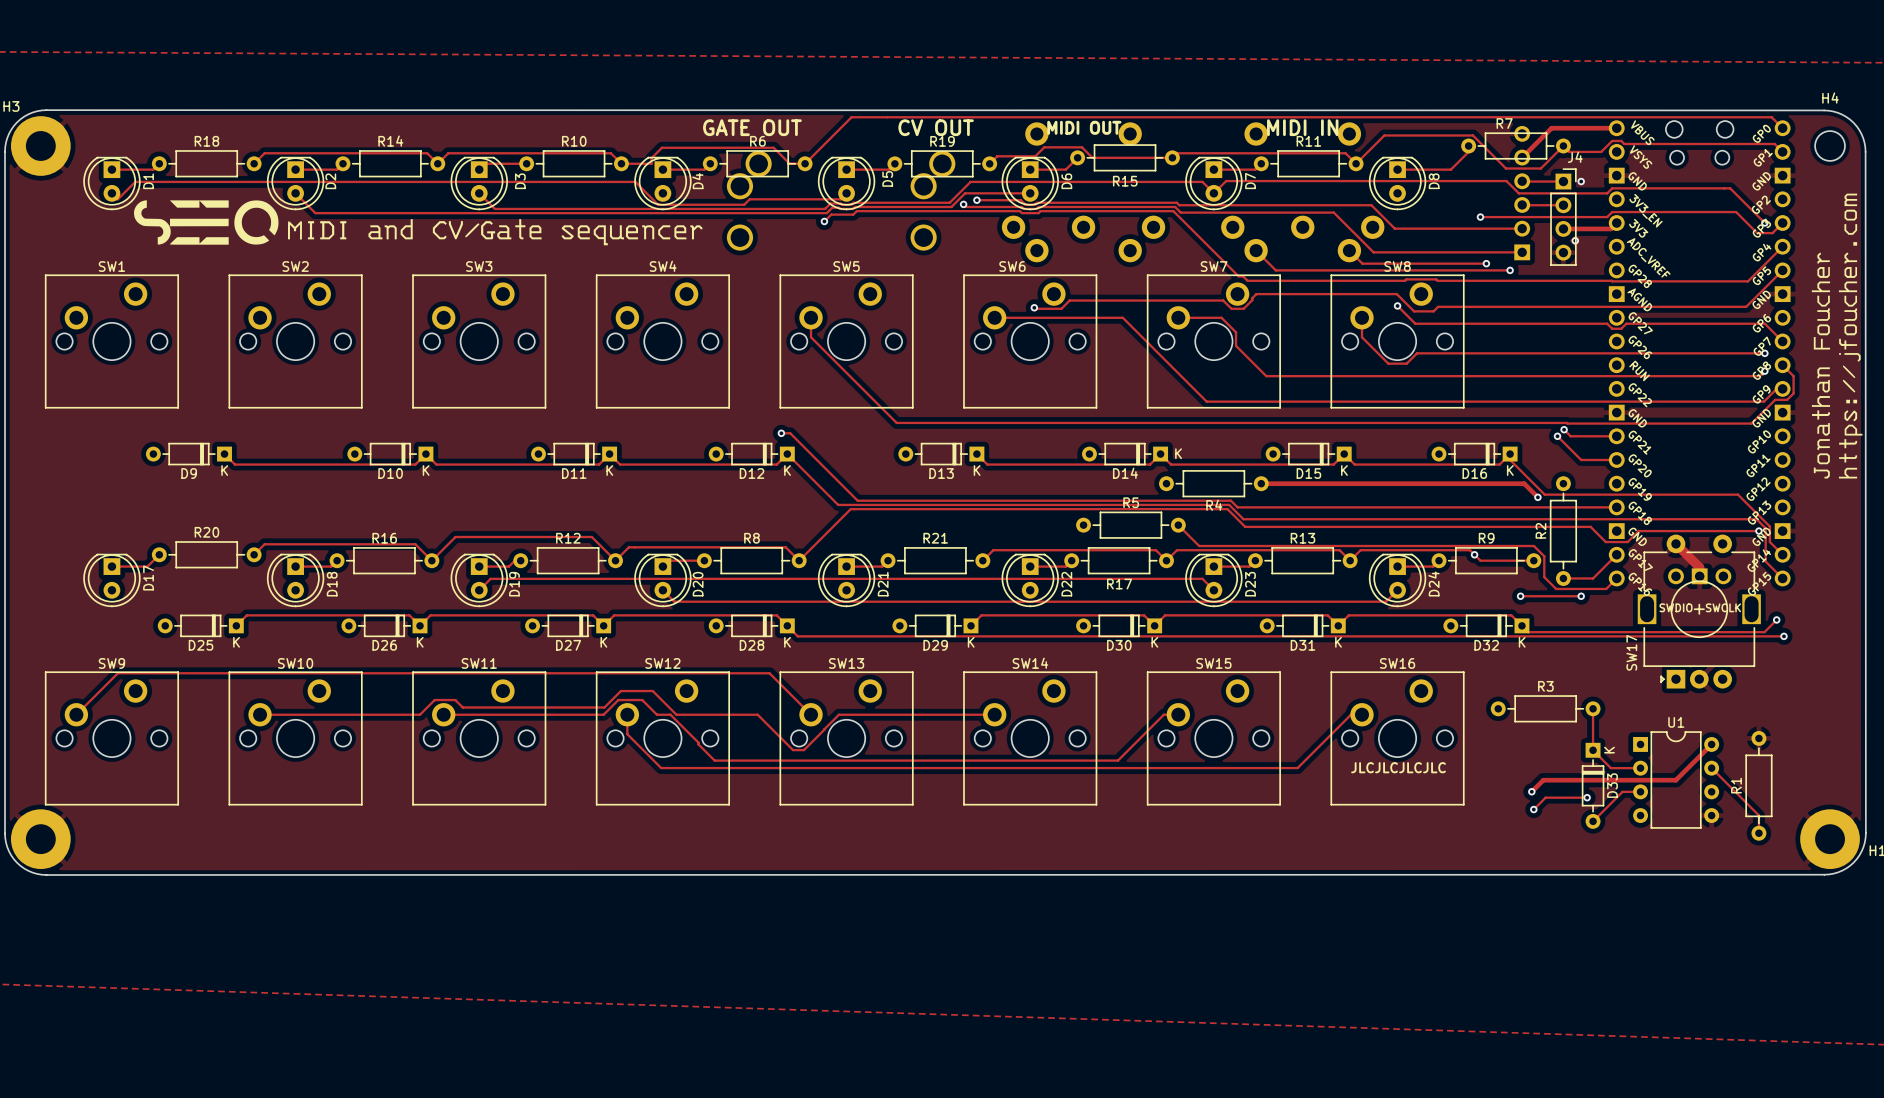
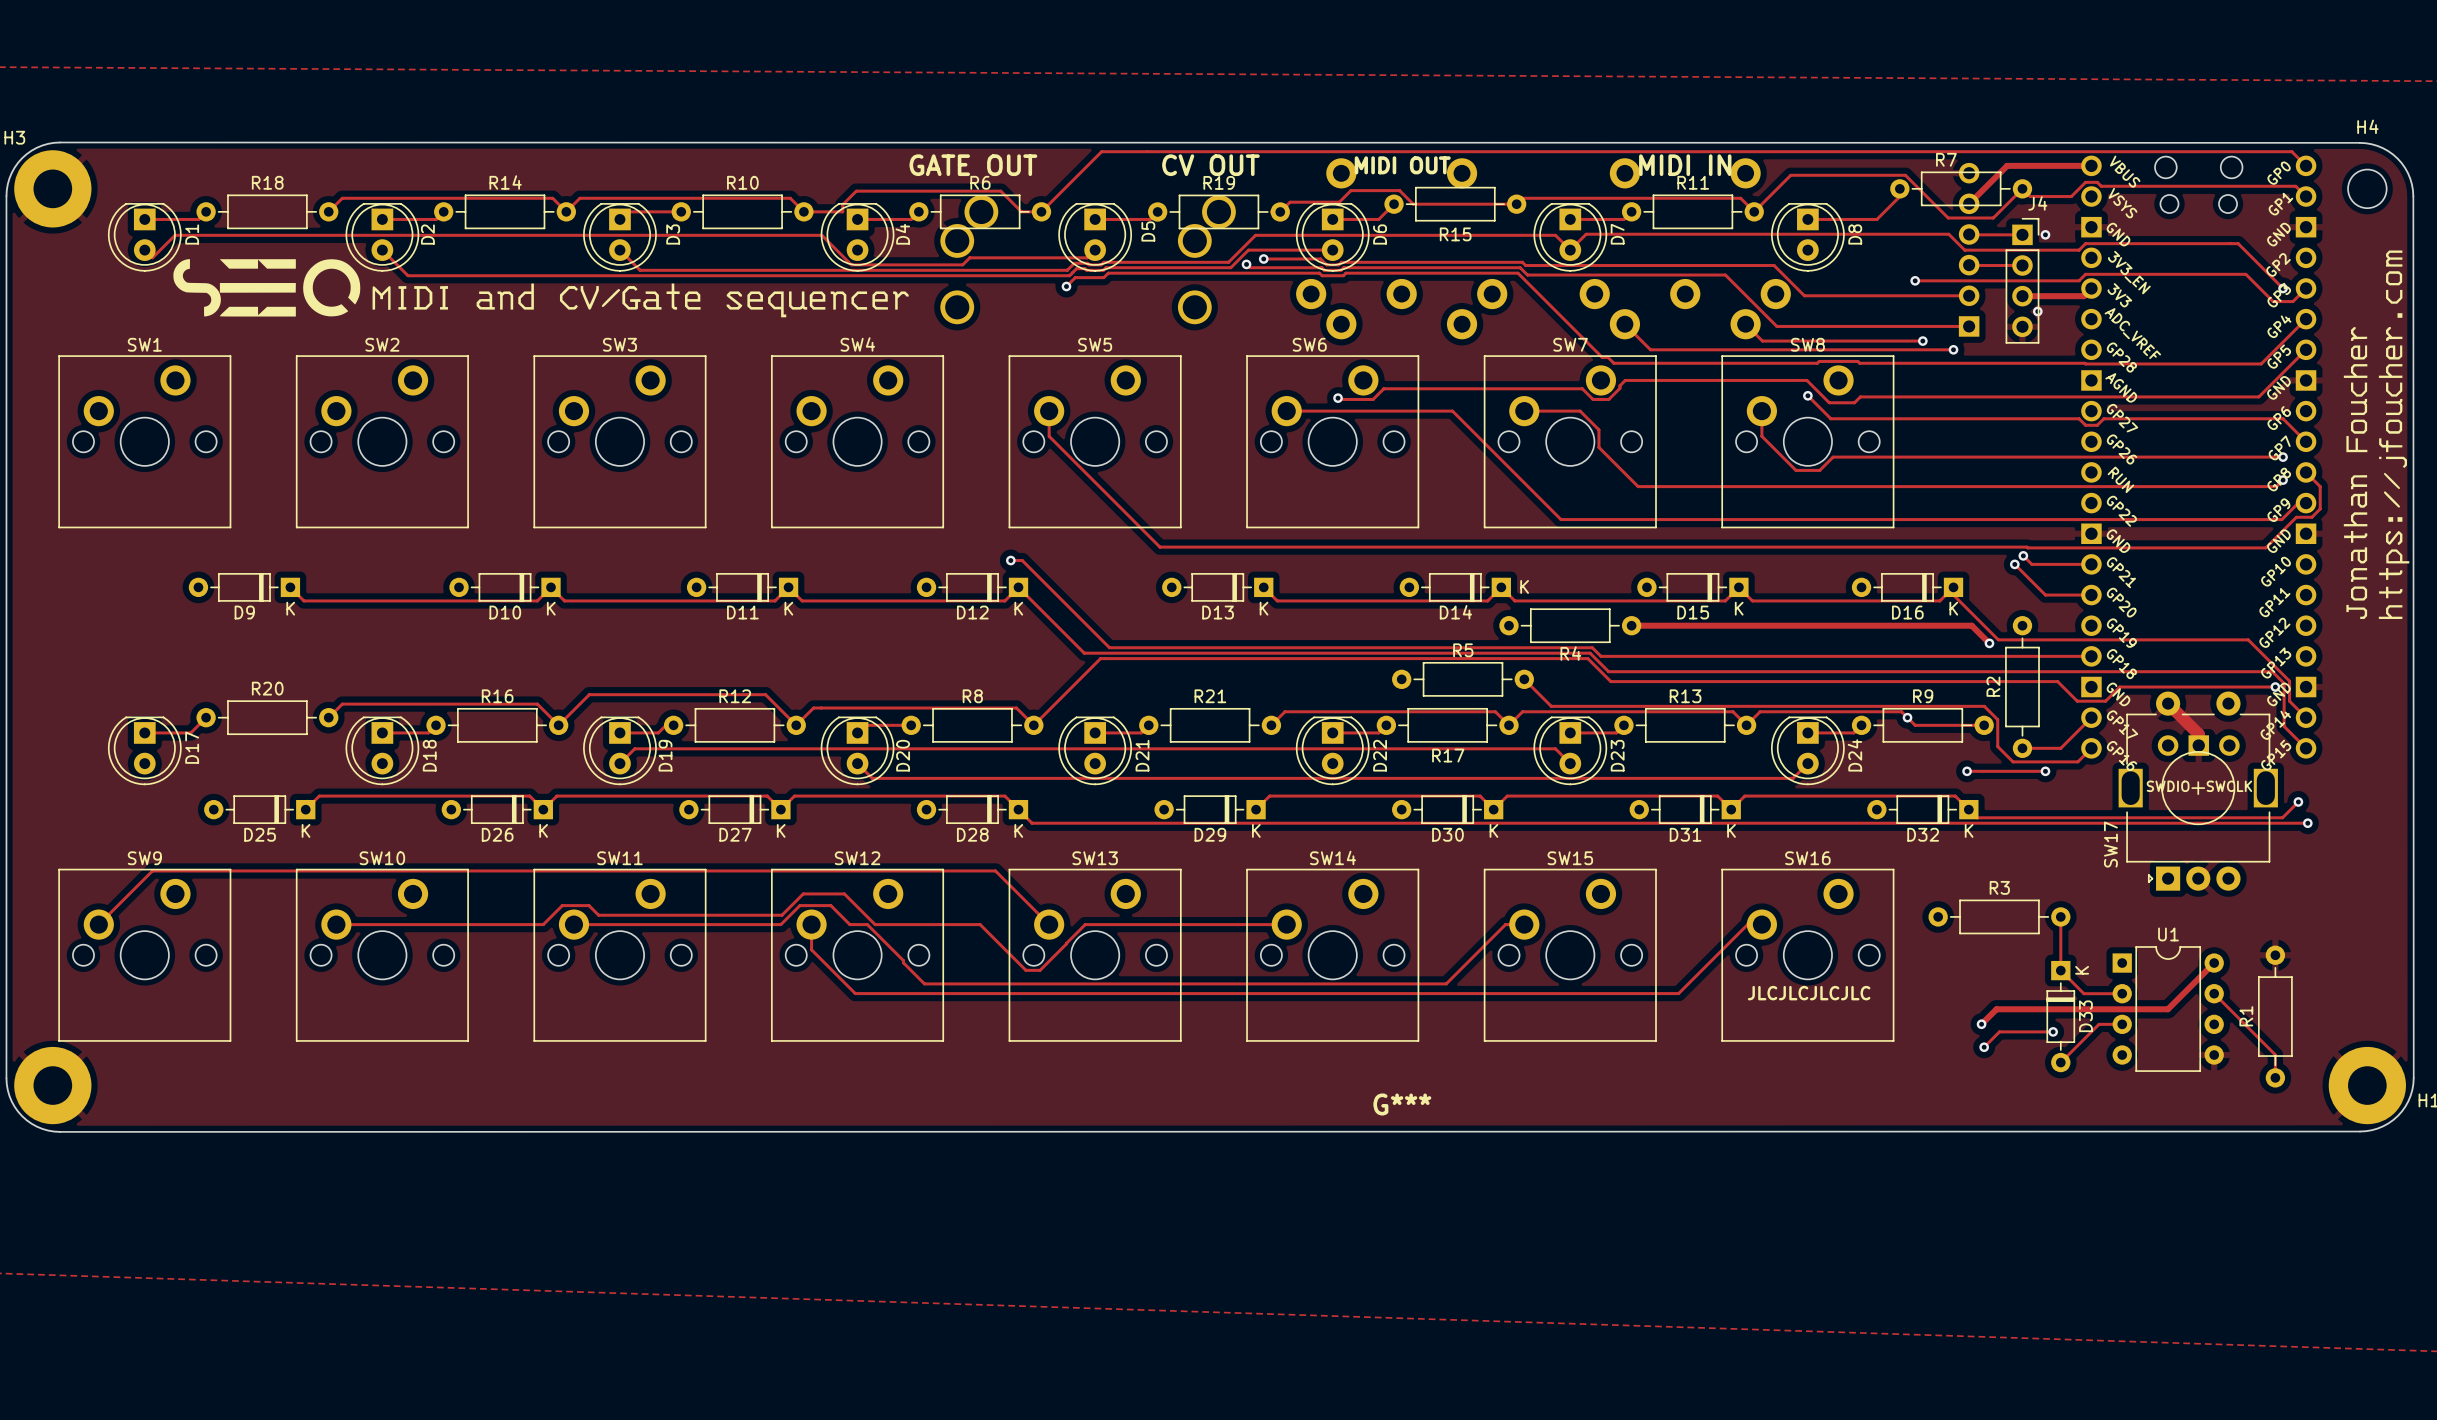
G***: none -> (1291, 434)

